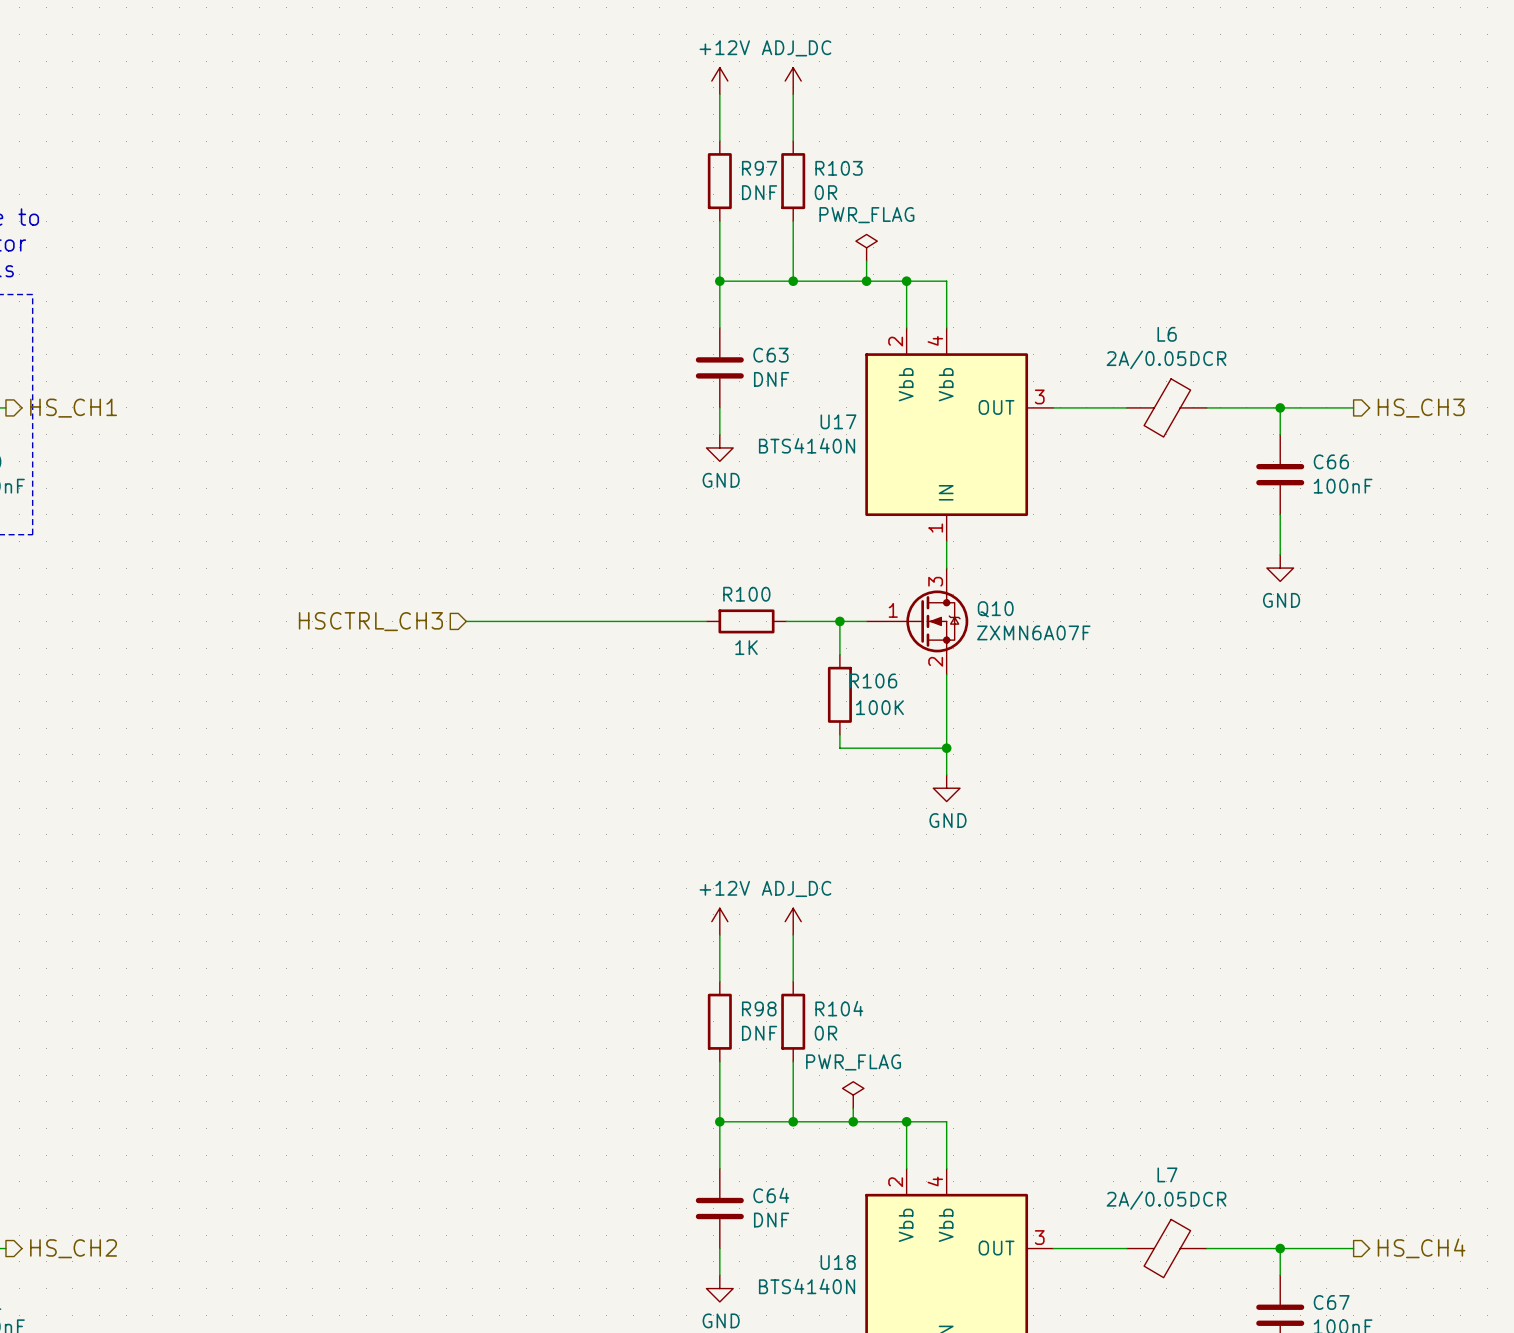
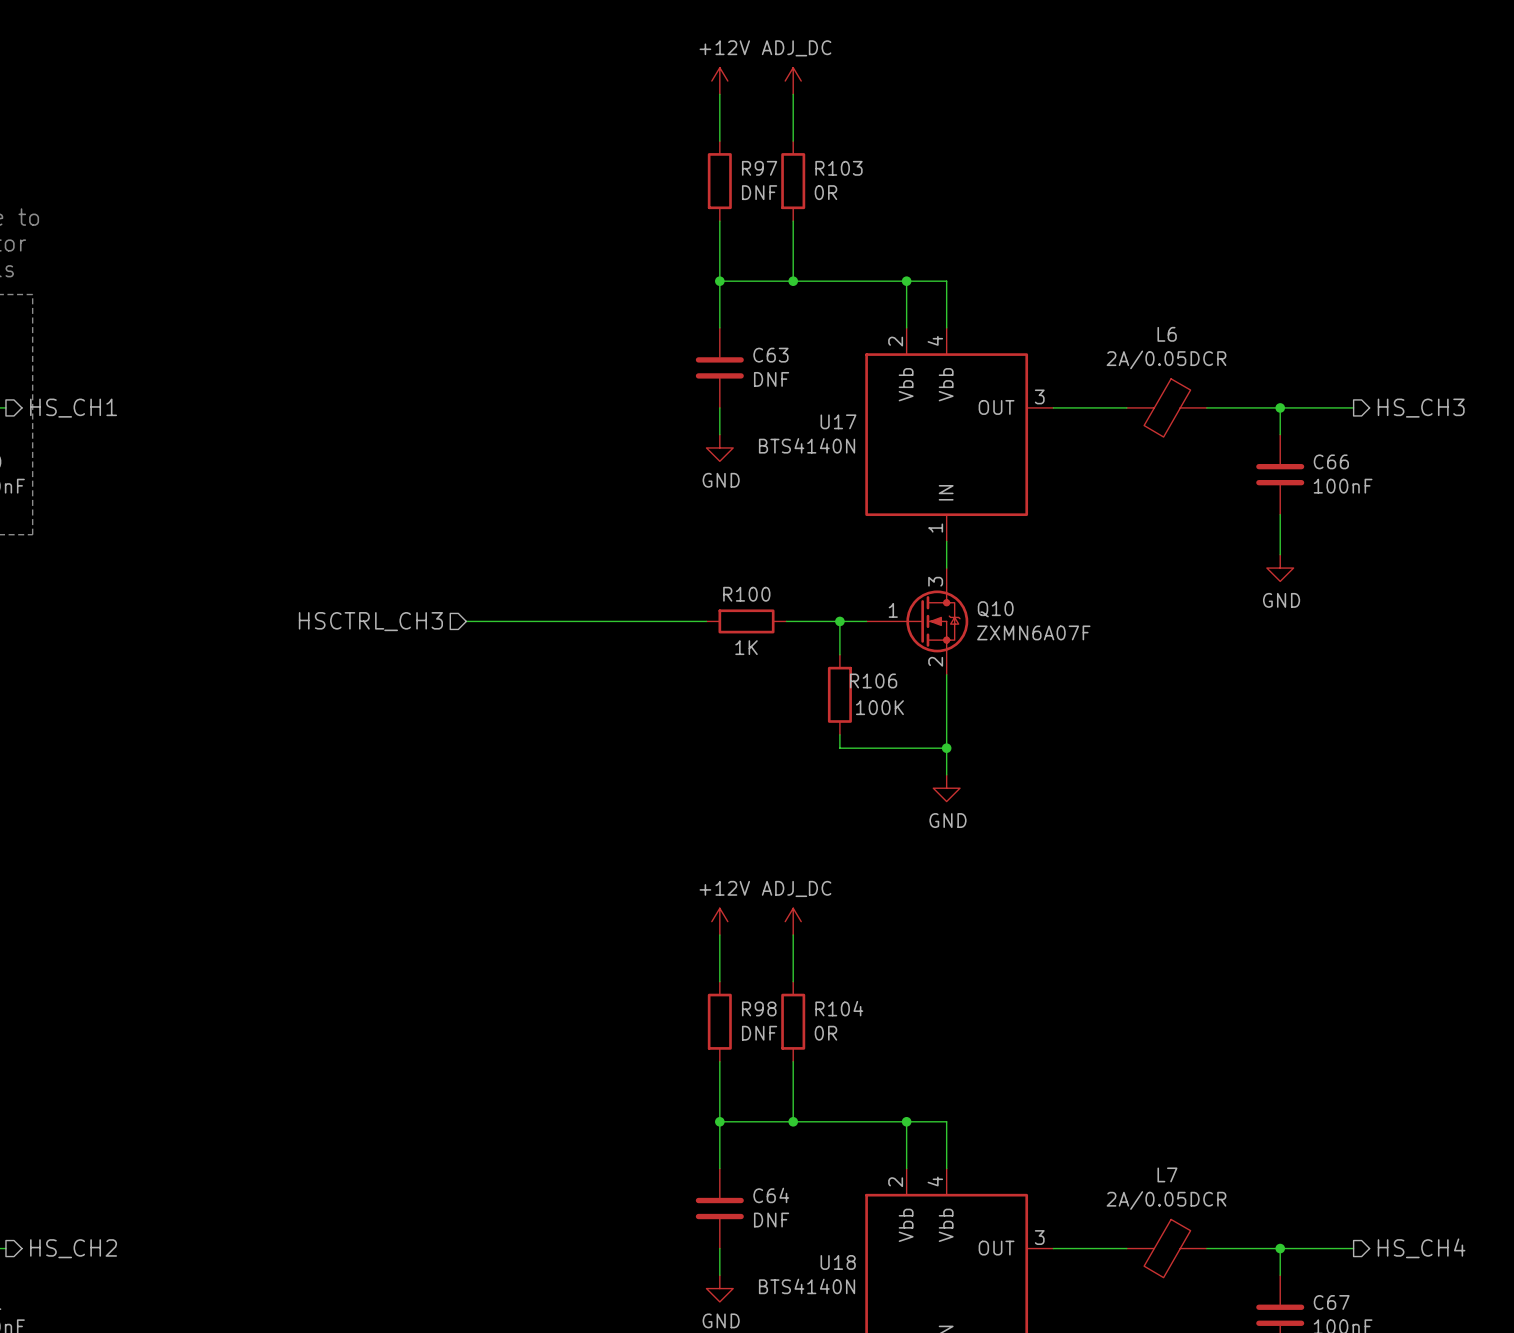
power symbol: PWR_FLAG (866, 247) -> none
wire: (866, 261) (866, 281) -> none
junction: (866, 281) -> none
power symbol: PWR_FLAG (853, 1095) -> none
wire: (853, 1108) (853, 1121) -> none
junction: (853, 1121) -> none

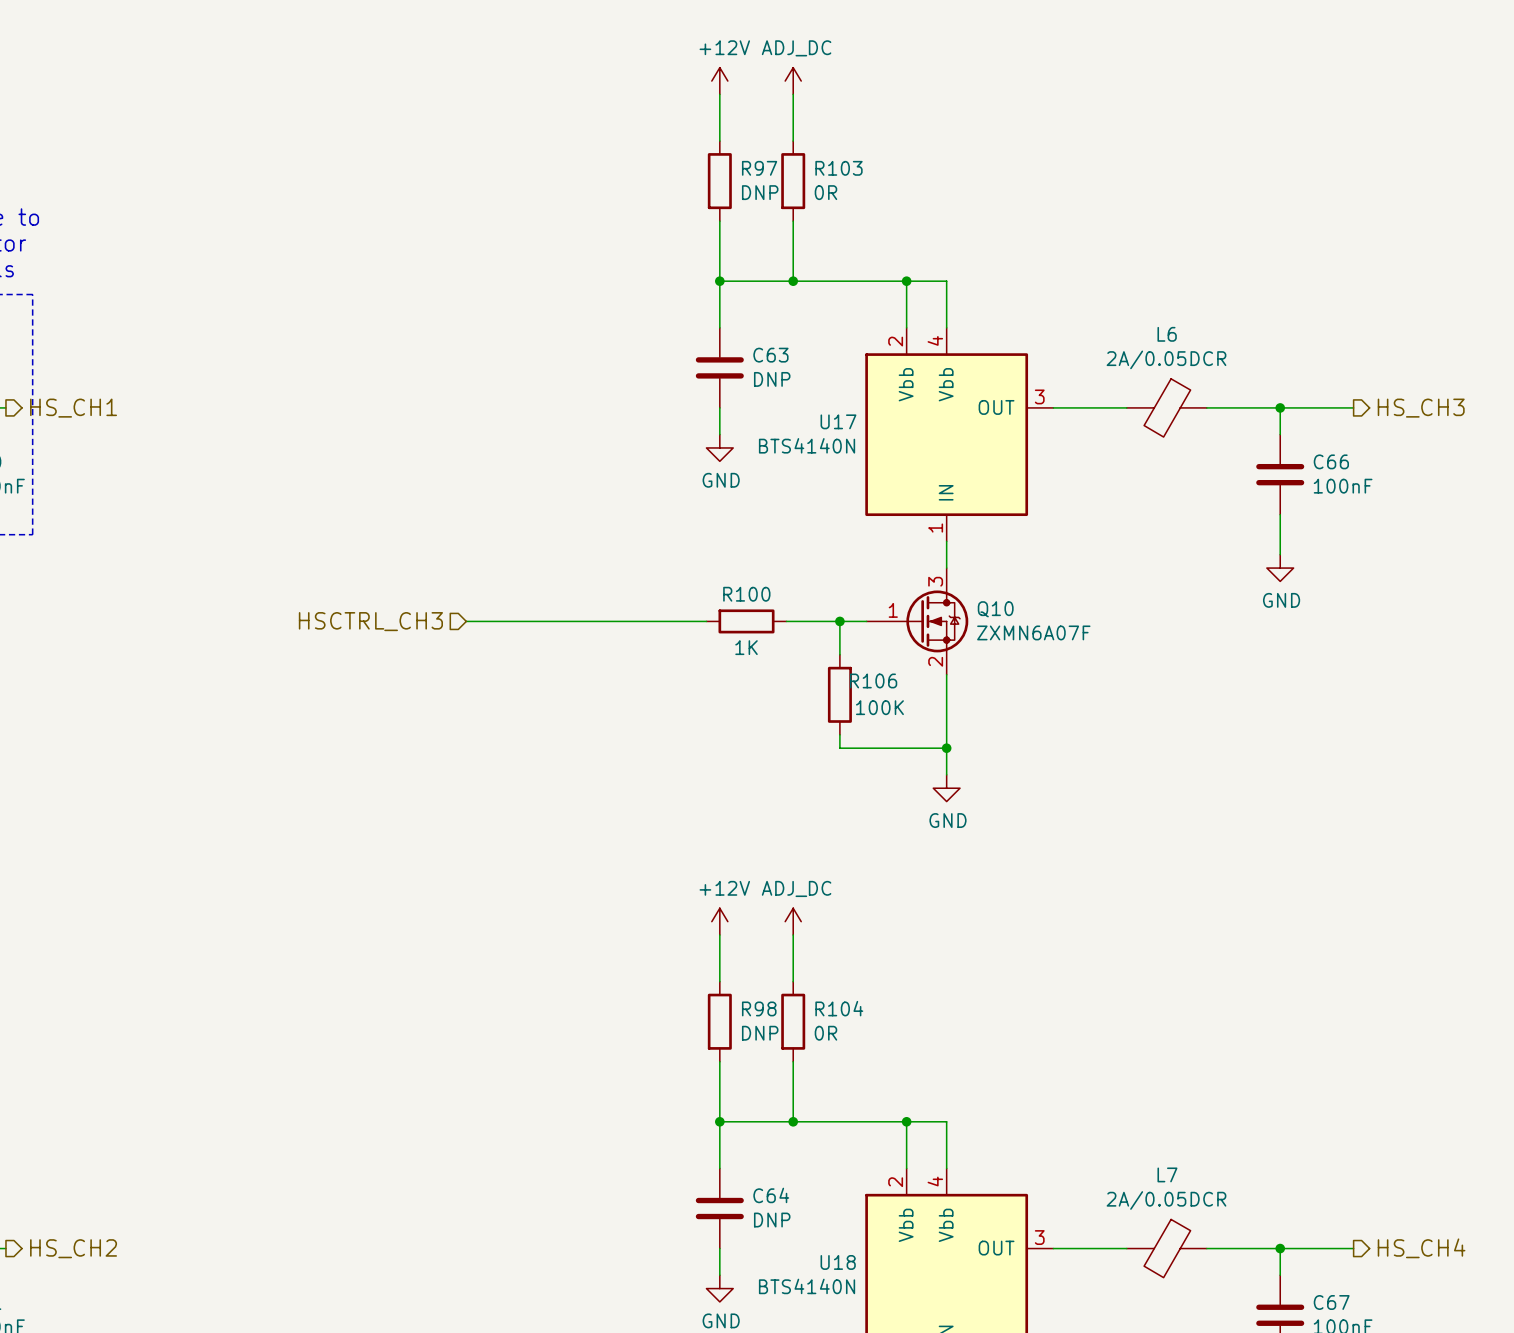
R97 value: DNF (759, 192) -> DNP (760, 192)
C63 value: DNF (771, 379) -> DNP (772, 379)
R98 value: DNF (759, 1033) -> DNP (760, 1033)
C64 value: DNF (771, 1220) -> DNP (772, 1220)

